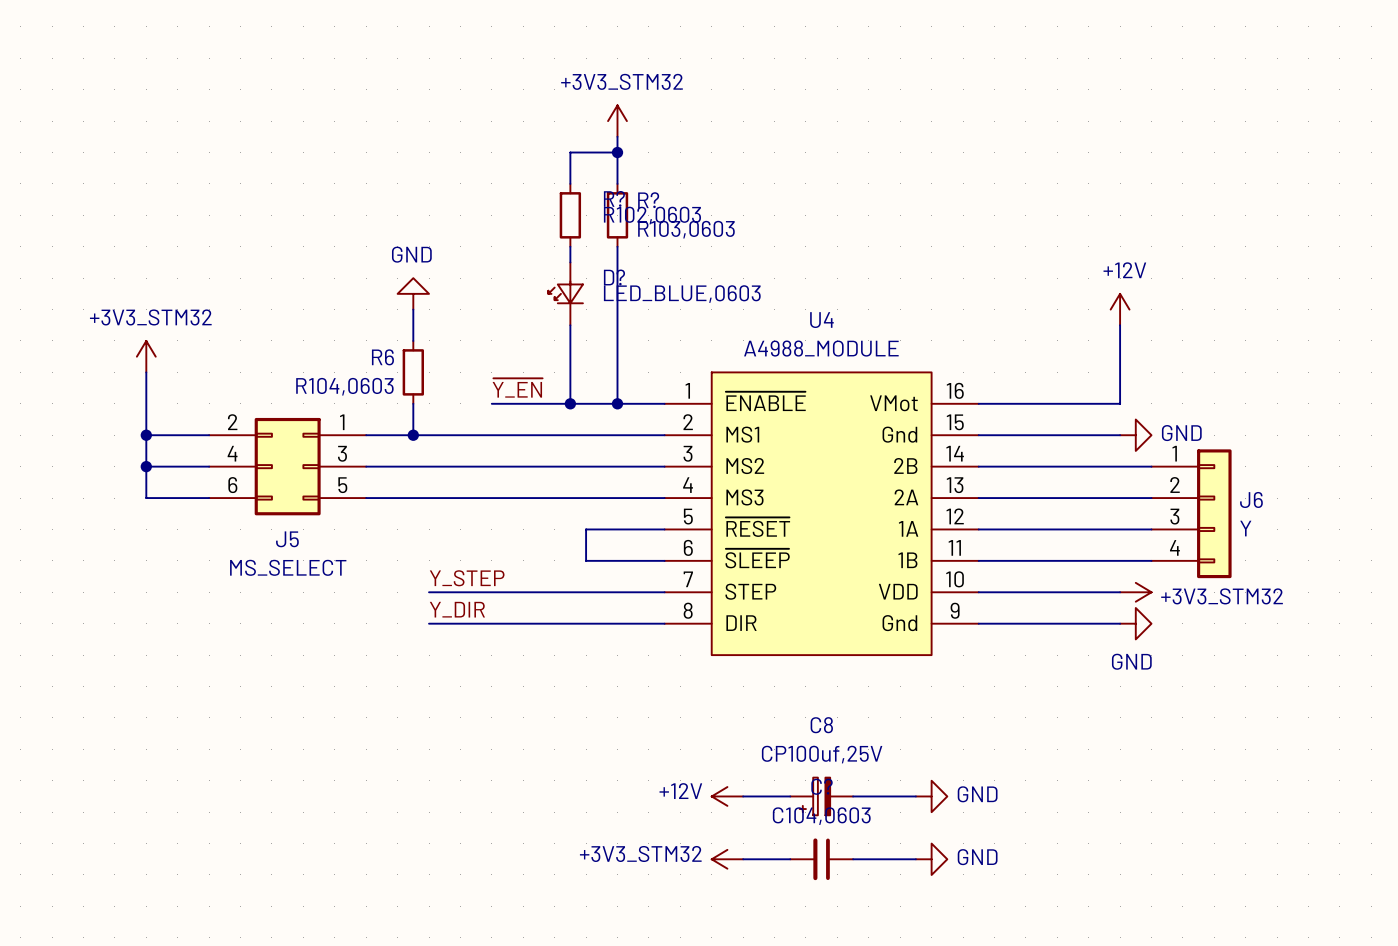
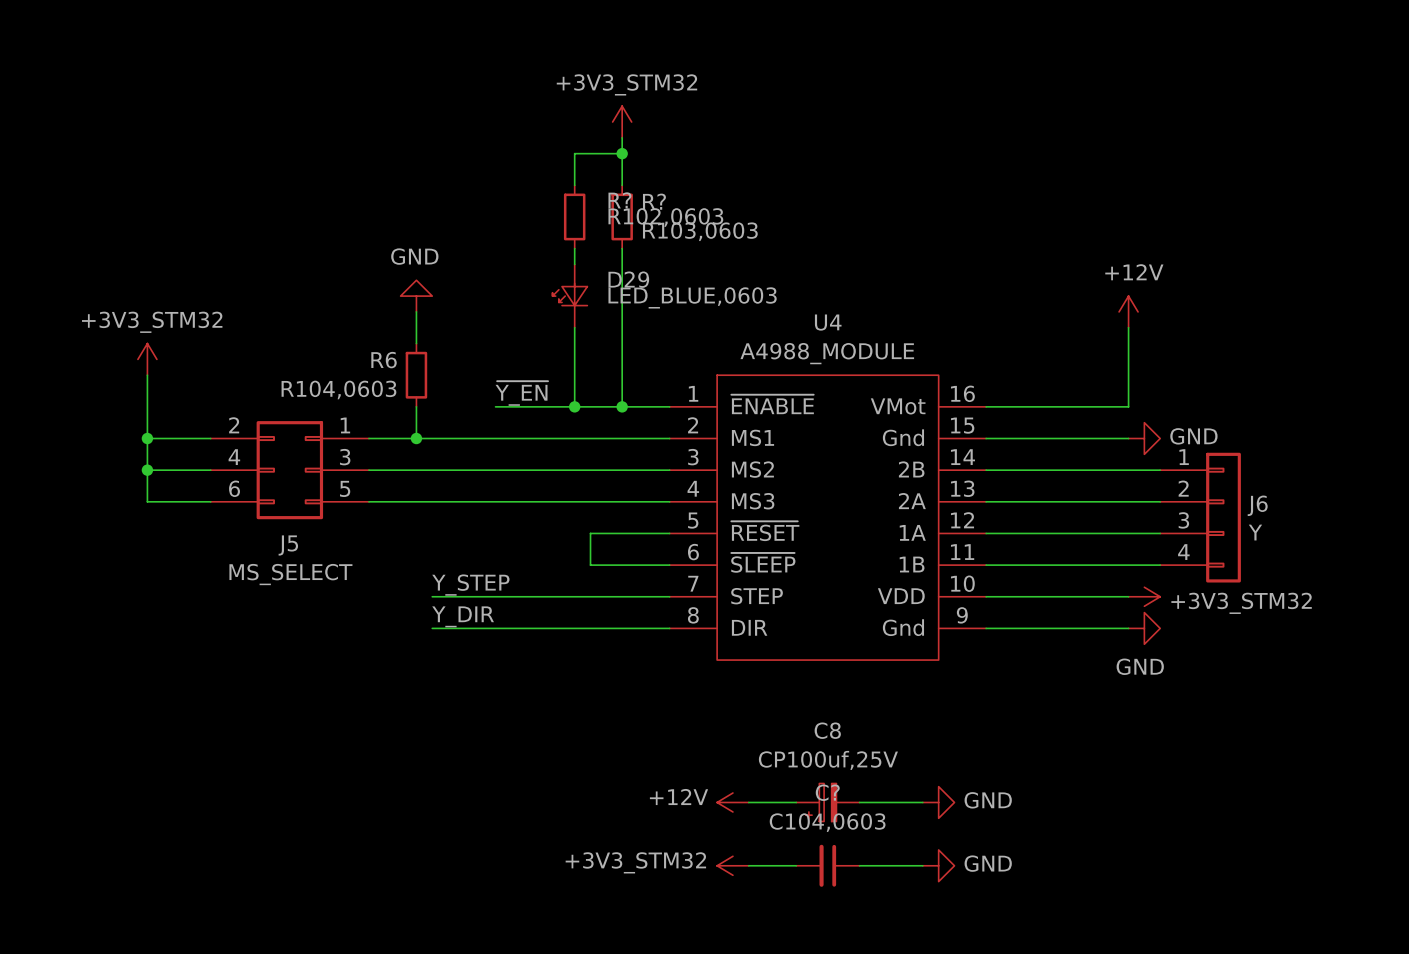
D? name: D? (614, 277) -> D29 (628, 279)

